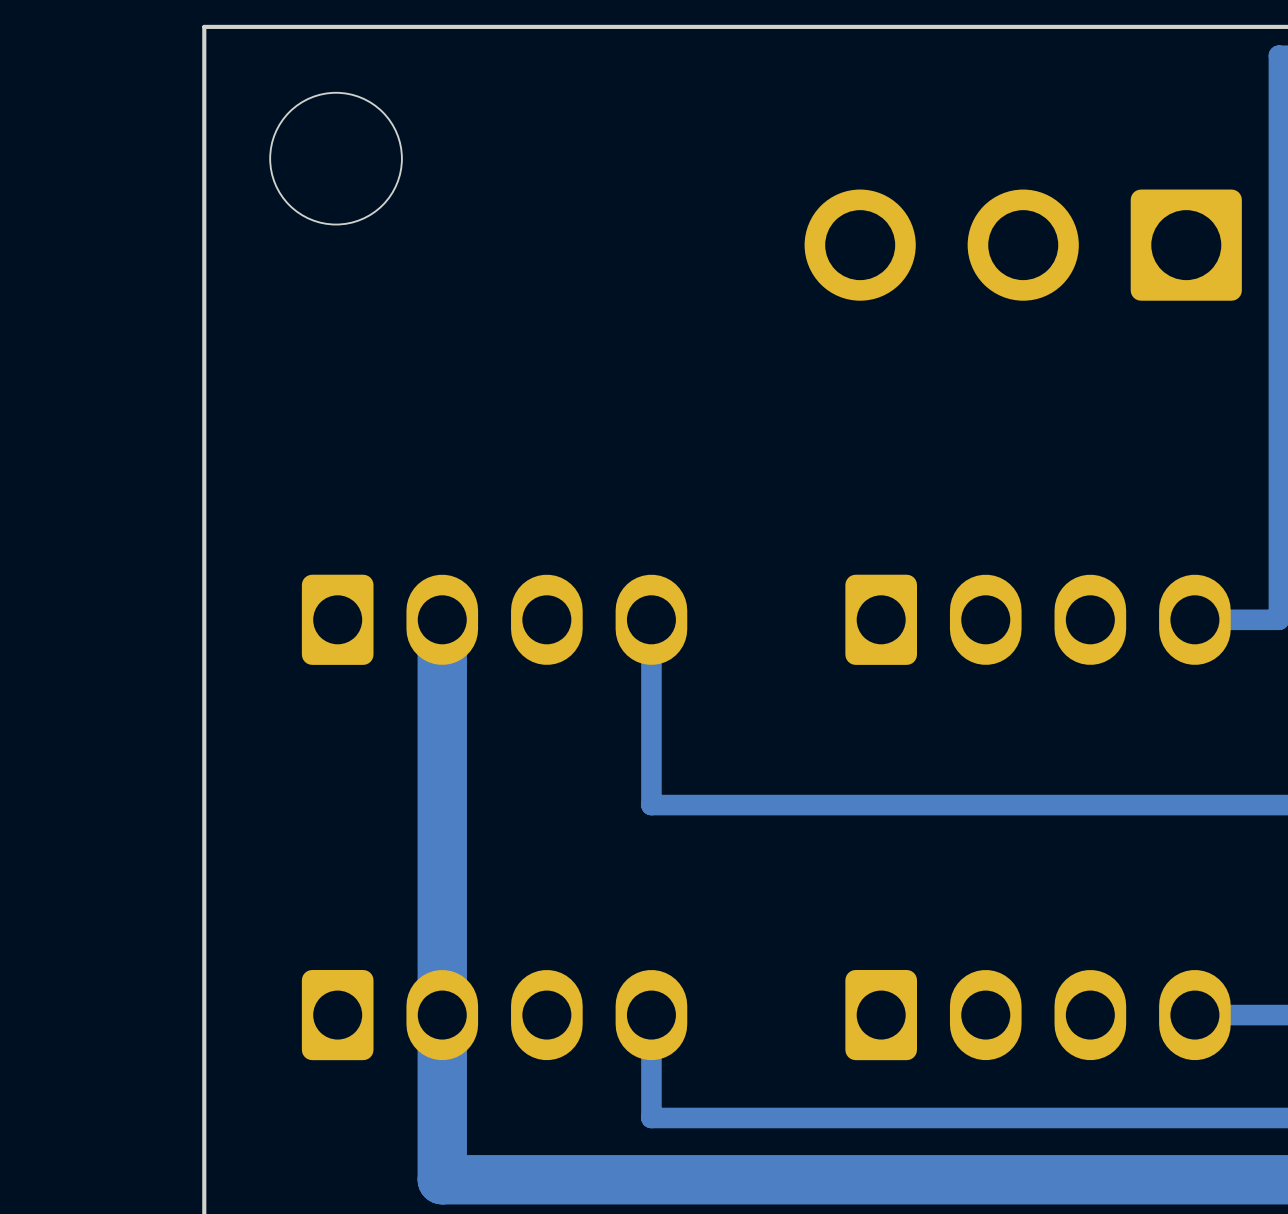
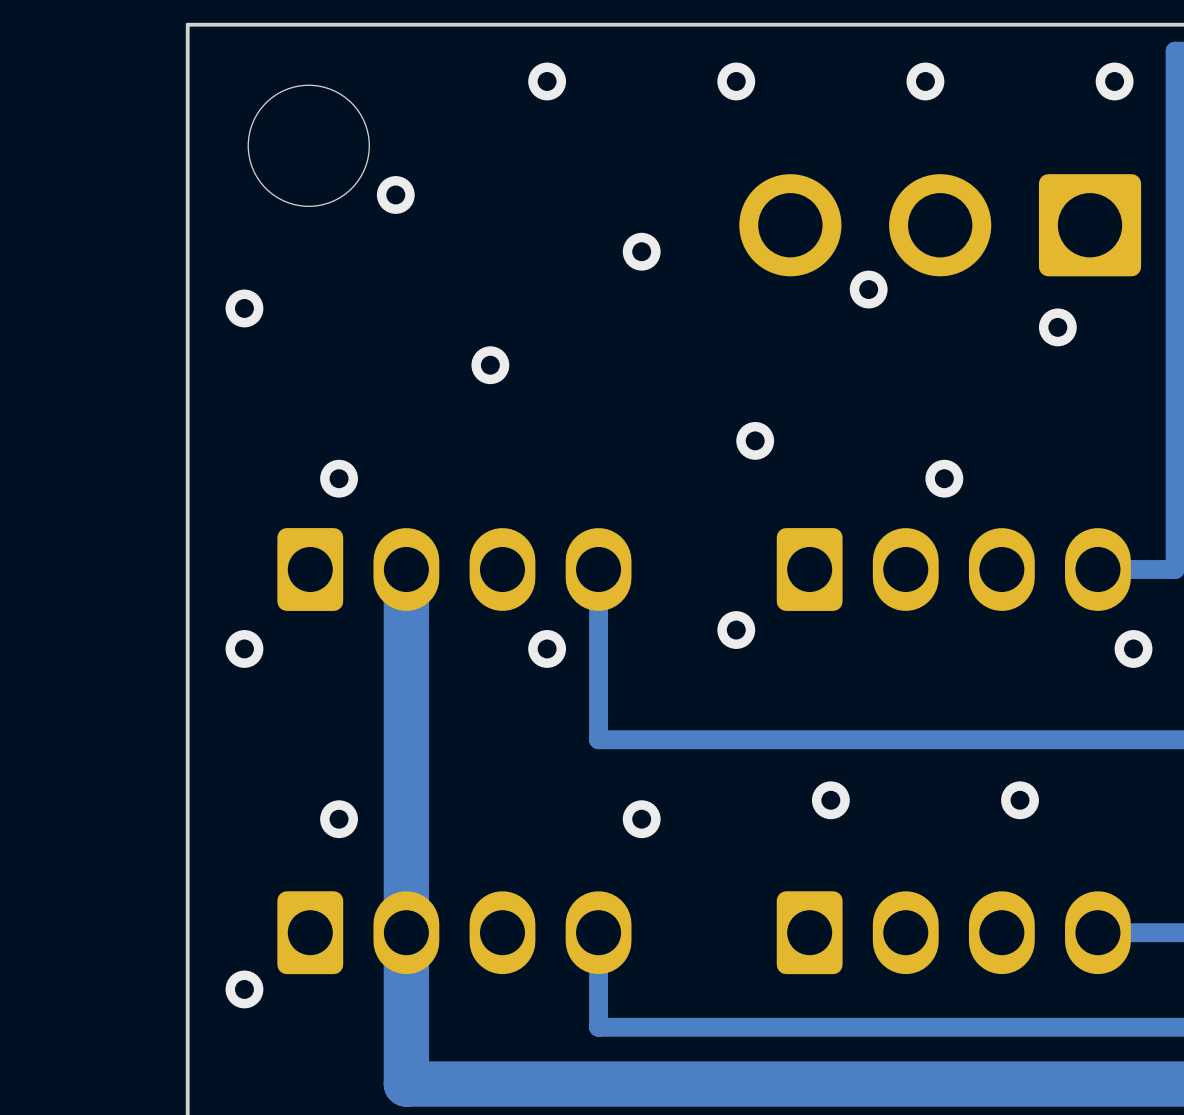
via: none -> (547, 81)
via: none -> (736, 81)
via: none -> (925, 81)
via: none -> (1114, 81)
via: none -> (395, 194)
via: none -> (641, 251)
via: none -> (868, 289)
via: none -> (244, 308)
via: none -> (1057, 327)
via: none -> (490, 365)
via: none -> (755, 440)
via: none -> (339, 478)
via: none -> (944, 478)
via: none -> (736, 630)
via: none -> (244, 648)
via: none -> (547, 648)
via: none -> (1133, 648)
via: none -> (830, 800)
via: none -> (1020, 800)
via: none -> (339, 819)
via: none -> (641, 819)
via: none -> (244, 989)

